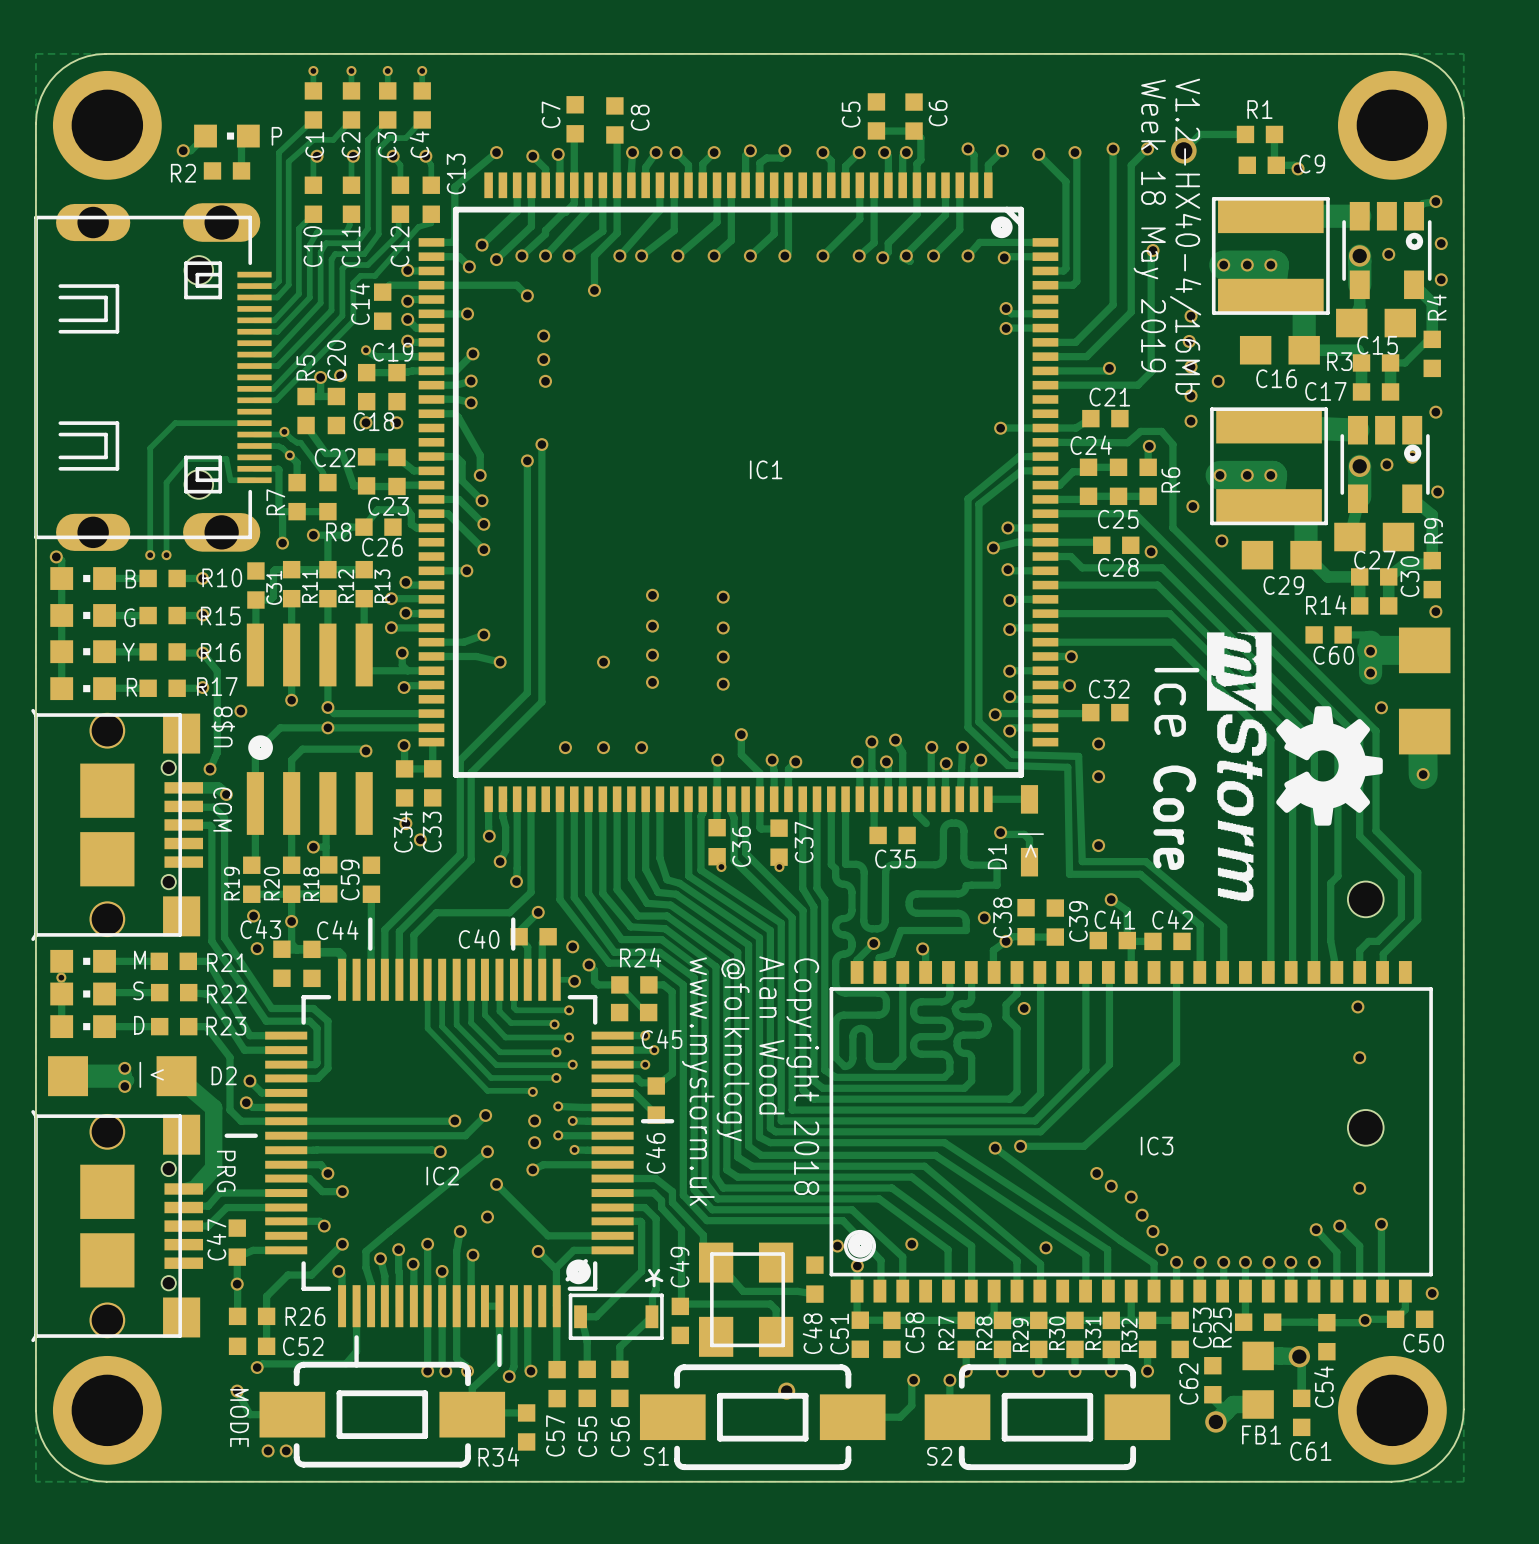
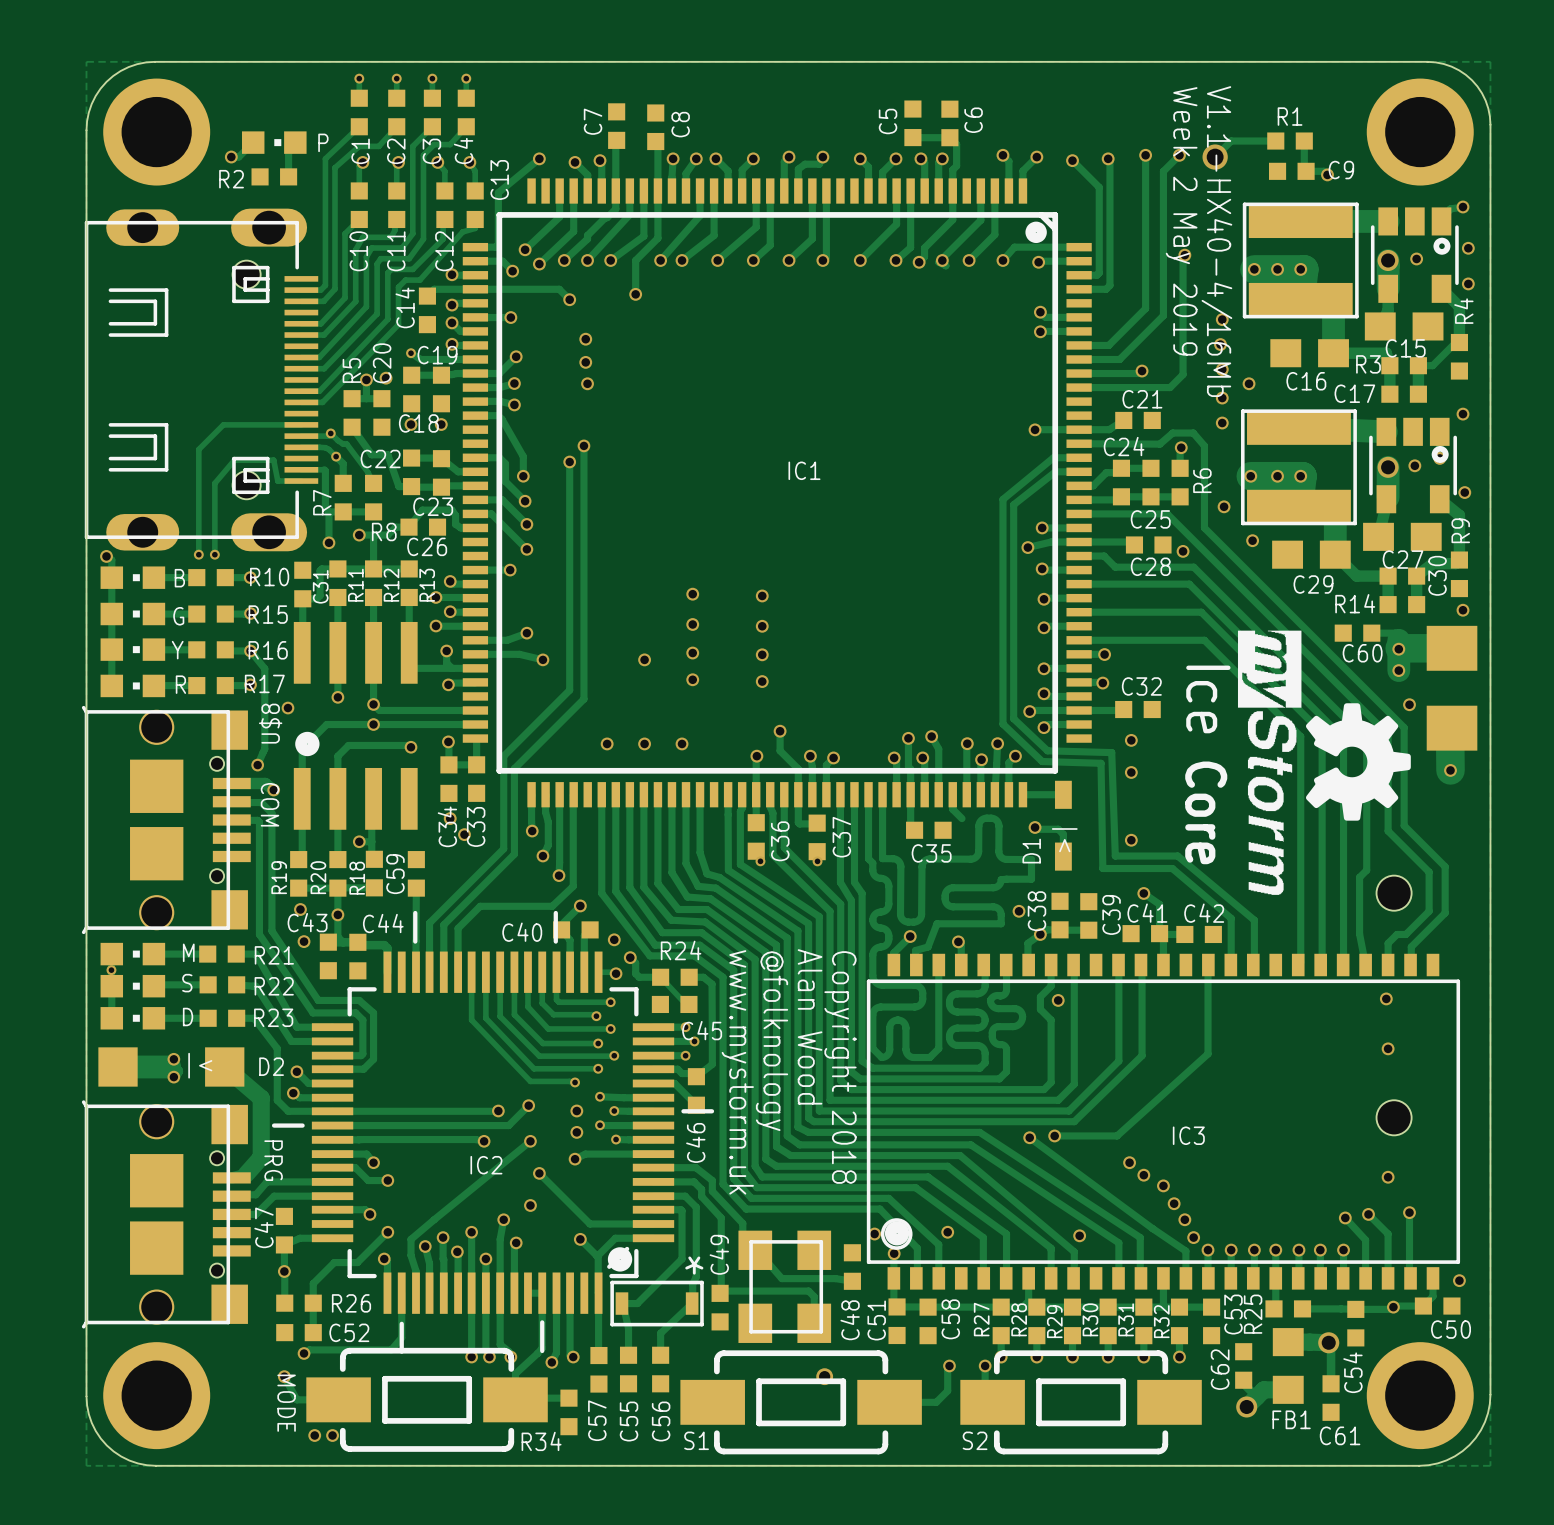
text: Week 18 May 2019 (1149, 225) -> Week 2 May 2019 (1181, 221)
text: V1.2-HX40-4/16Mb (1185, 236) -> V1.1-HX40-4/16Mb (1216, 241)

